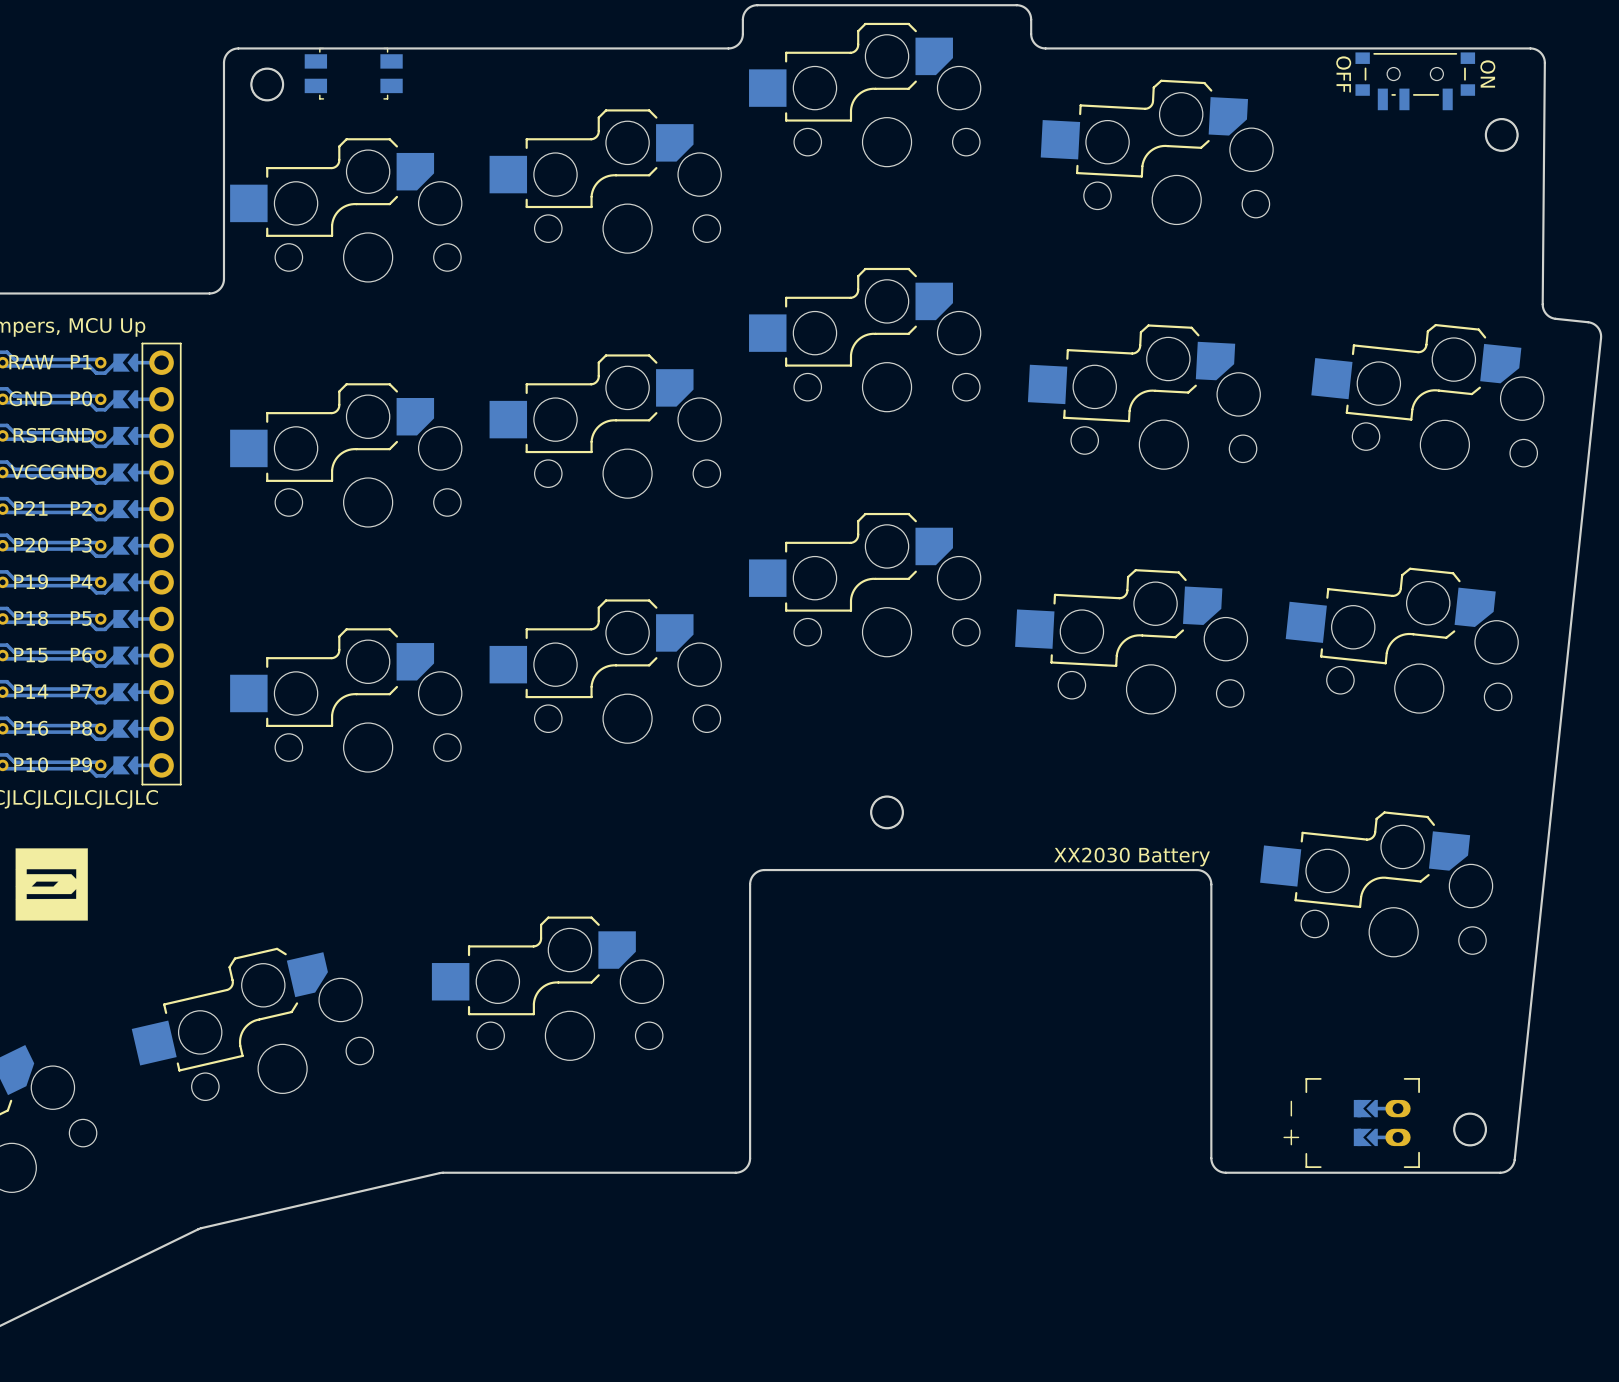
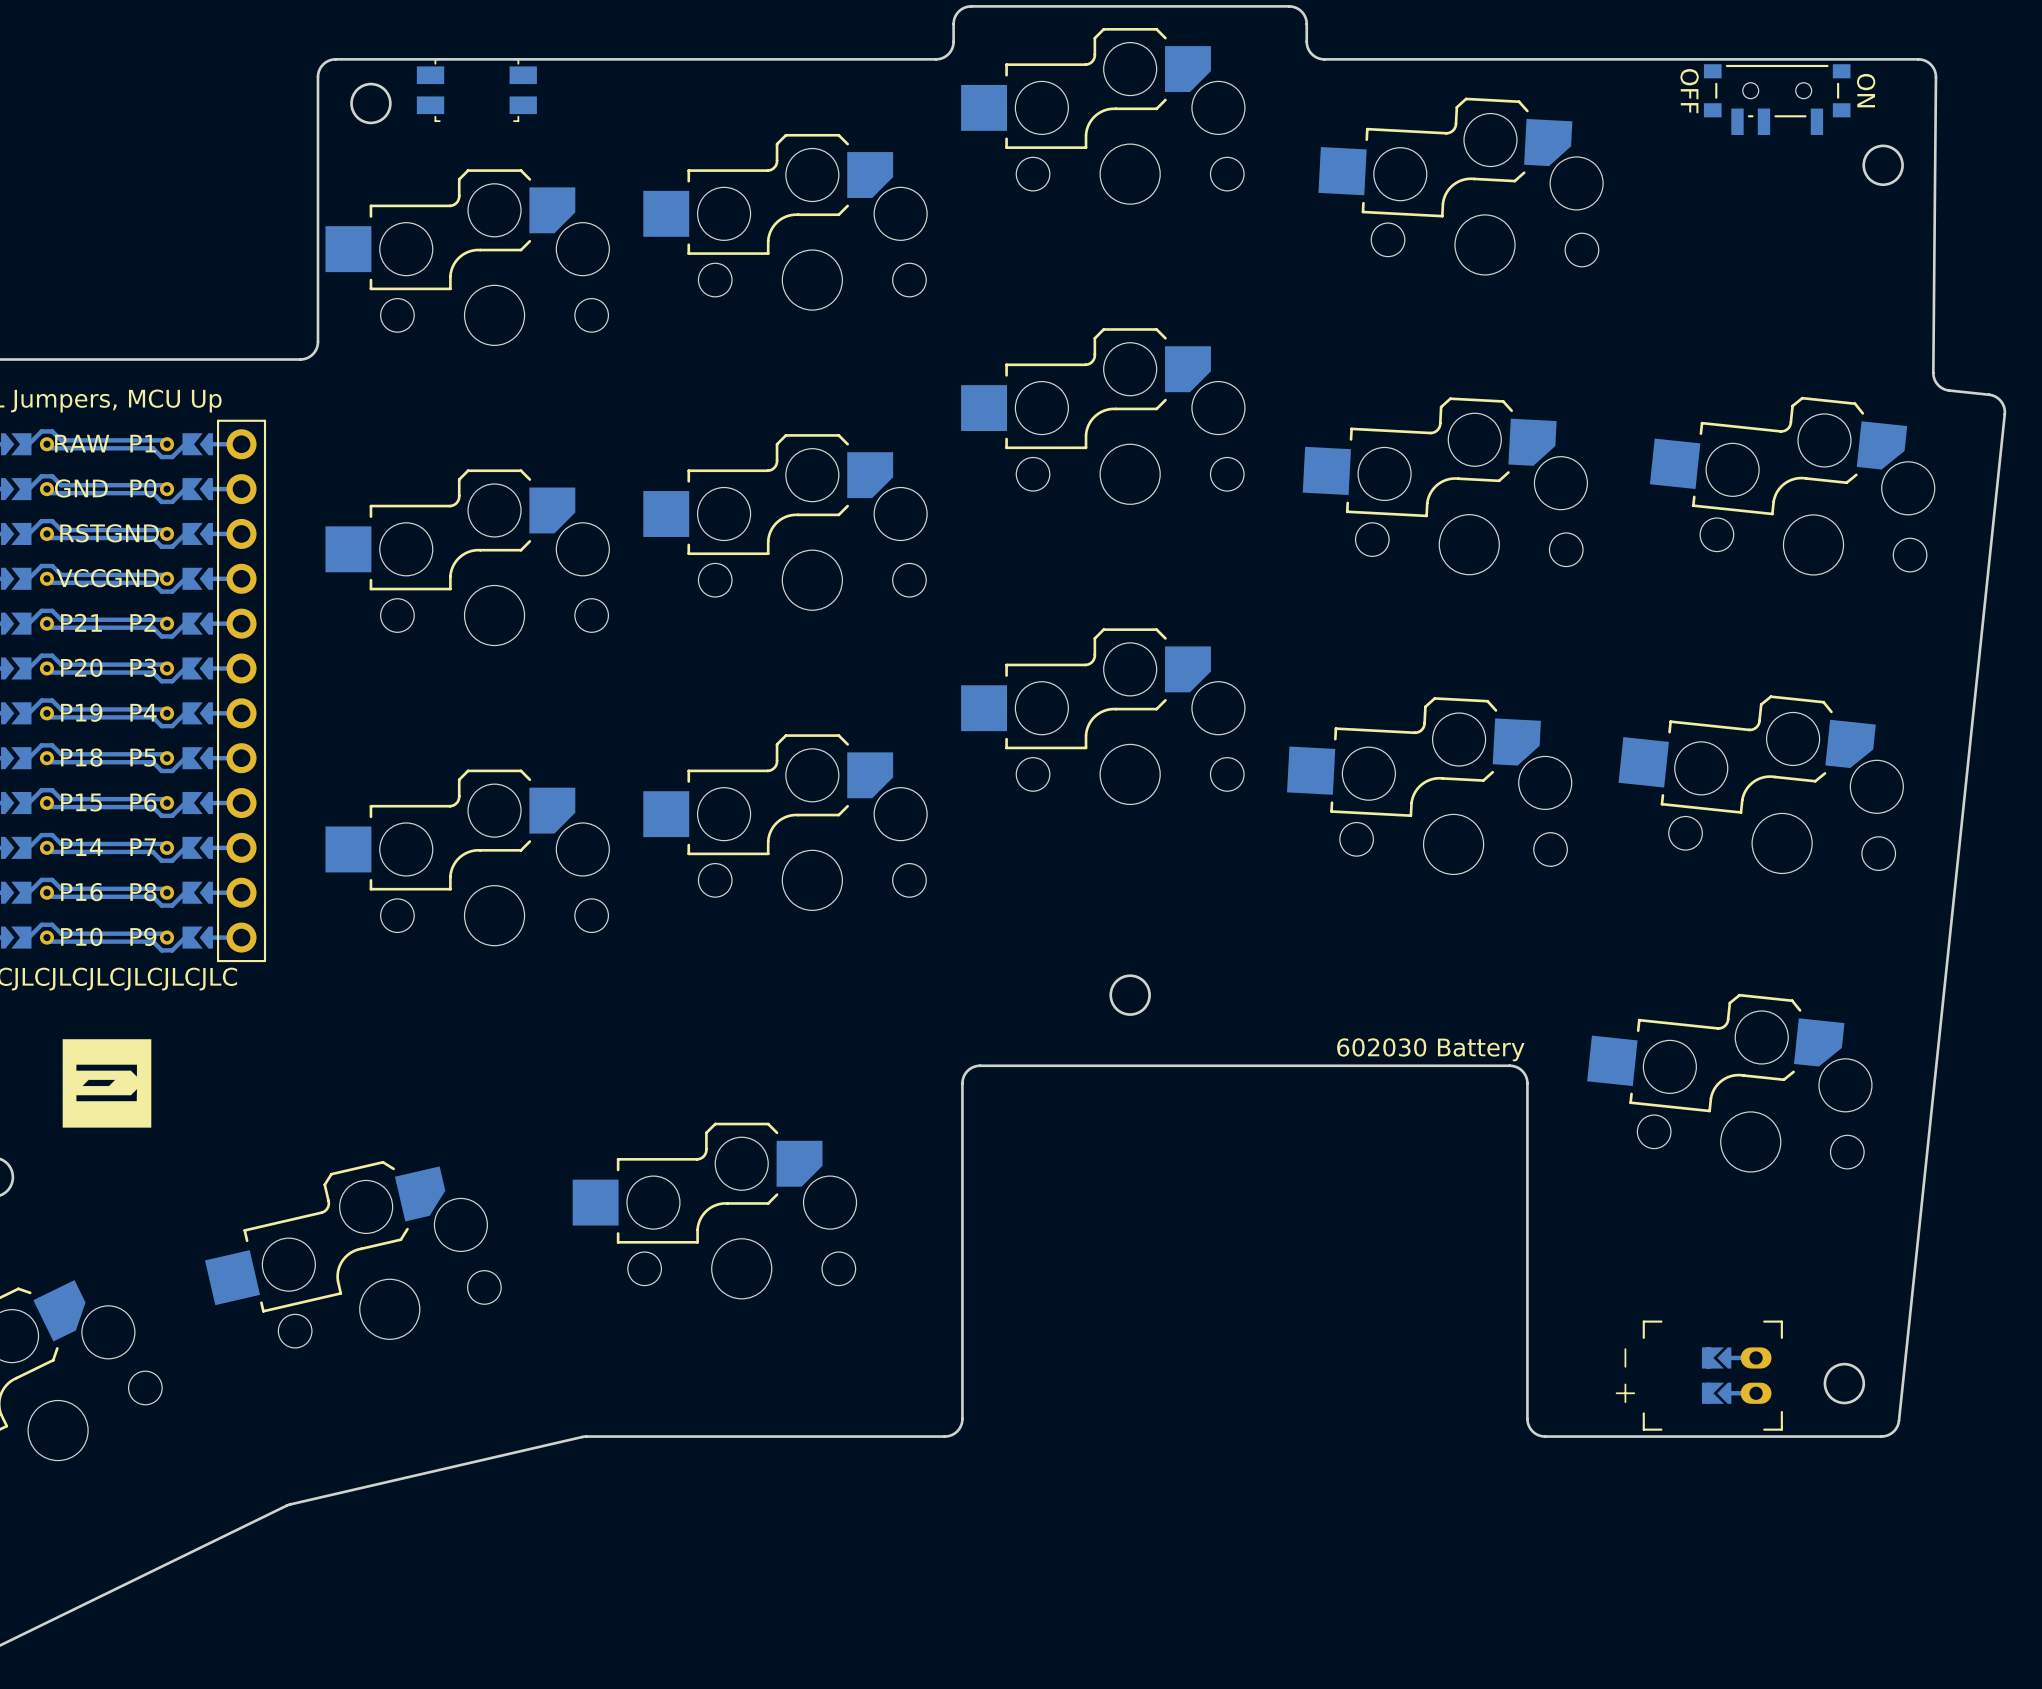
text: XX2030 Battery (1132, 857) -> 602030 Battery (1430, 1049)

